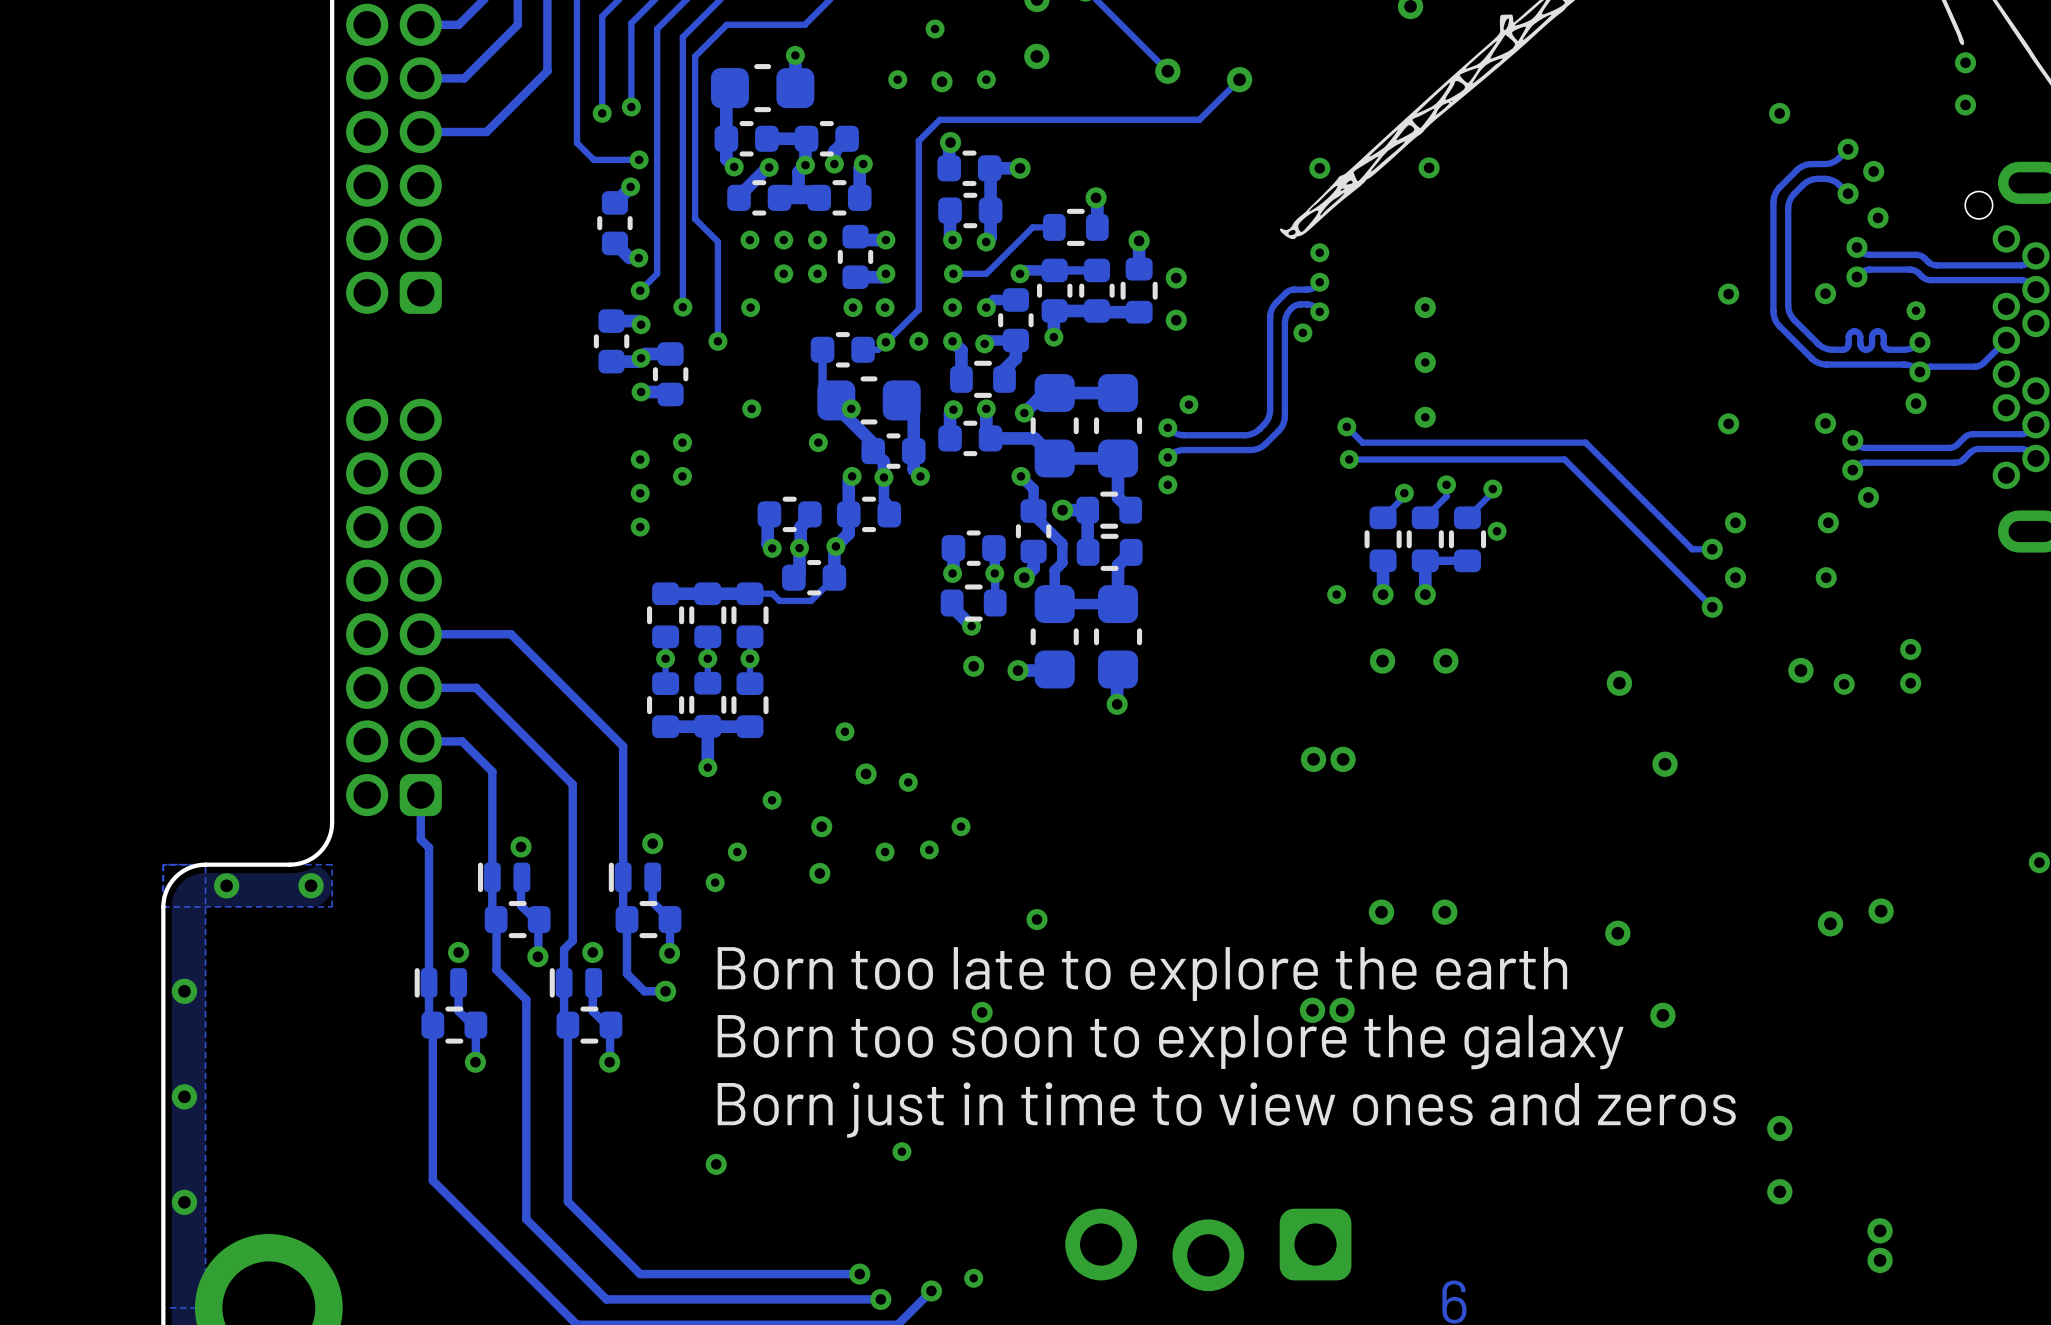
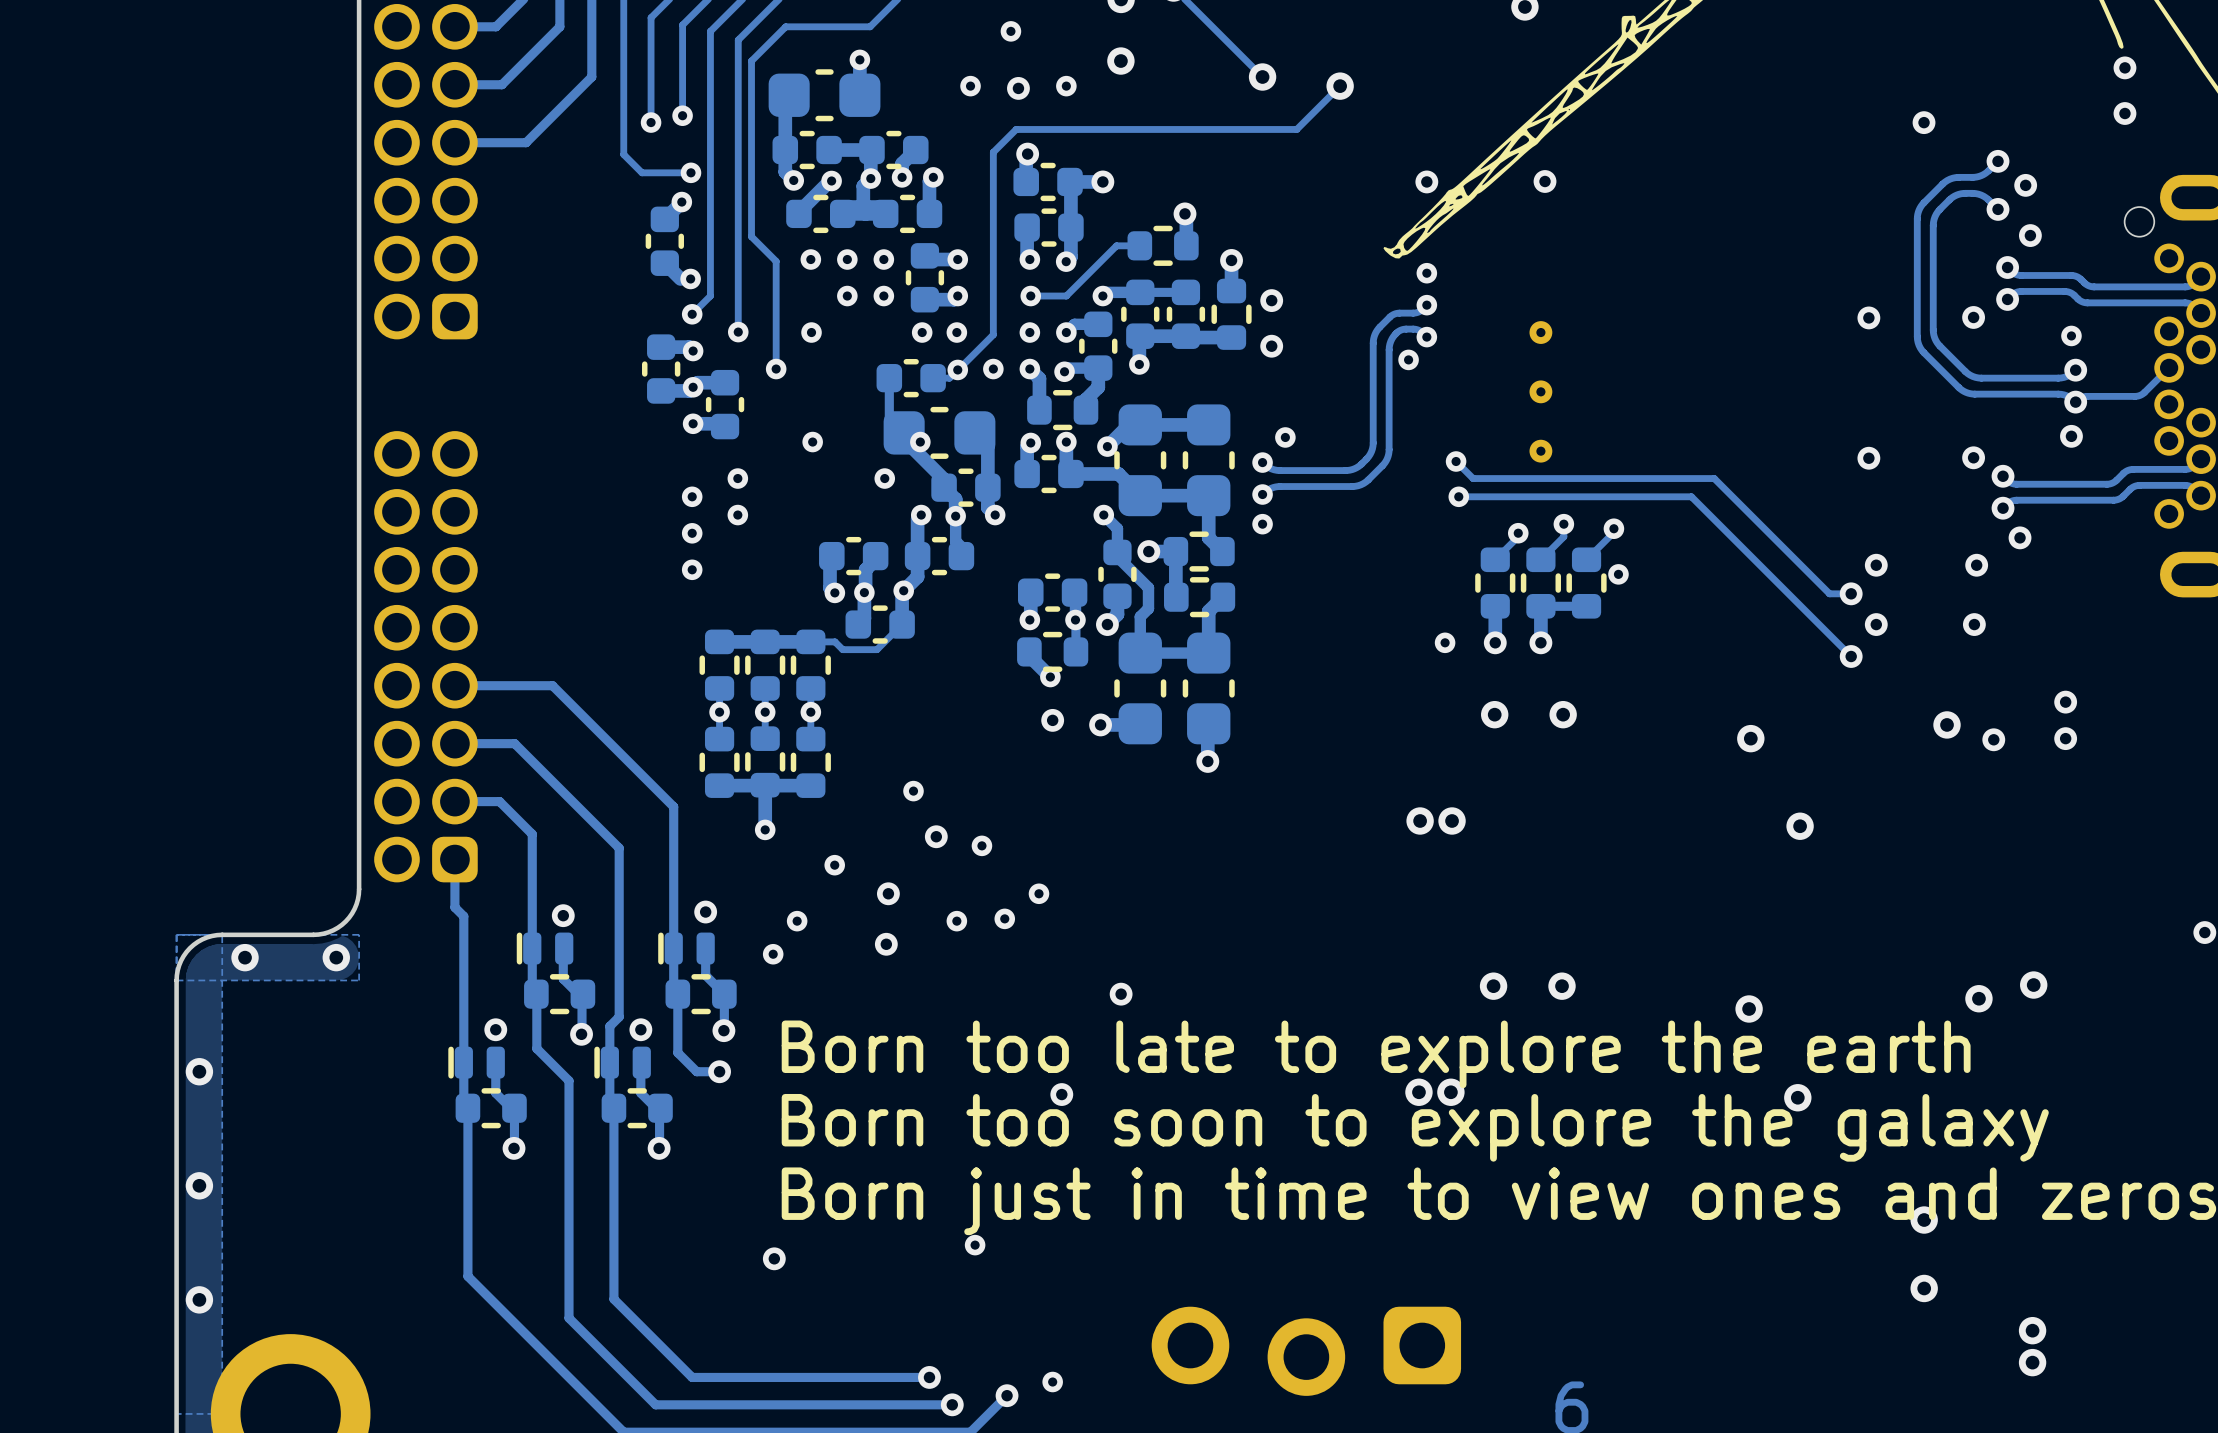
track: (1889, 349) (1884, 346) (1882, 334) (1877, 331) (1872, 334) (1871, 345) (1869, 349) (1861, 347) (1859, 334) (1854, 331) (1849, 334) (1847, 346) (1842, 349) -> (2042, 378) (1992, 378)

